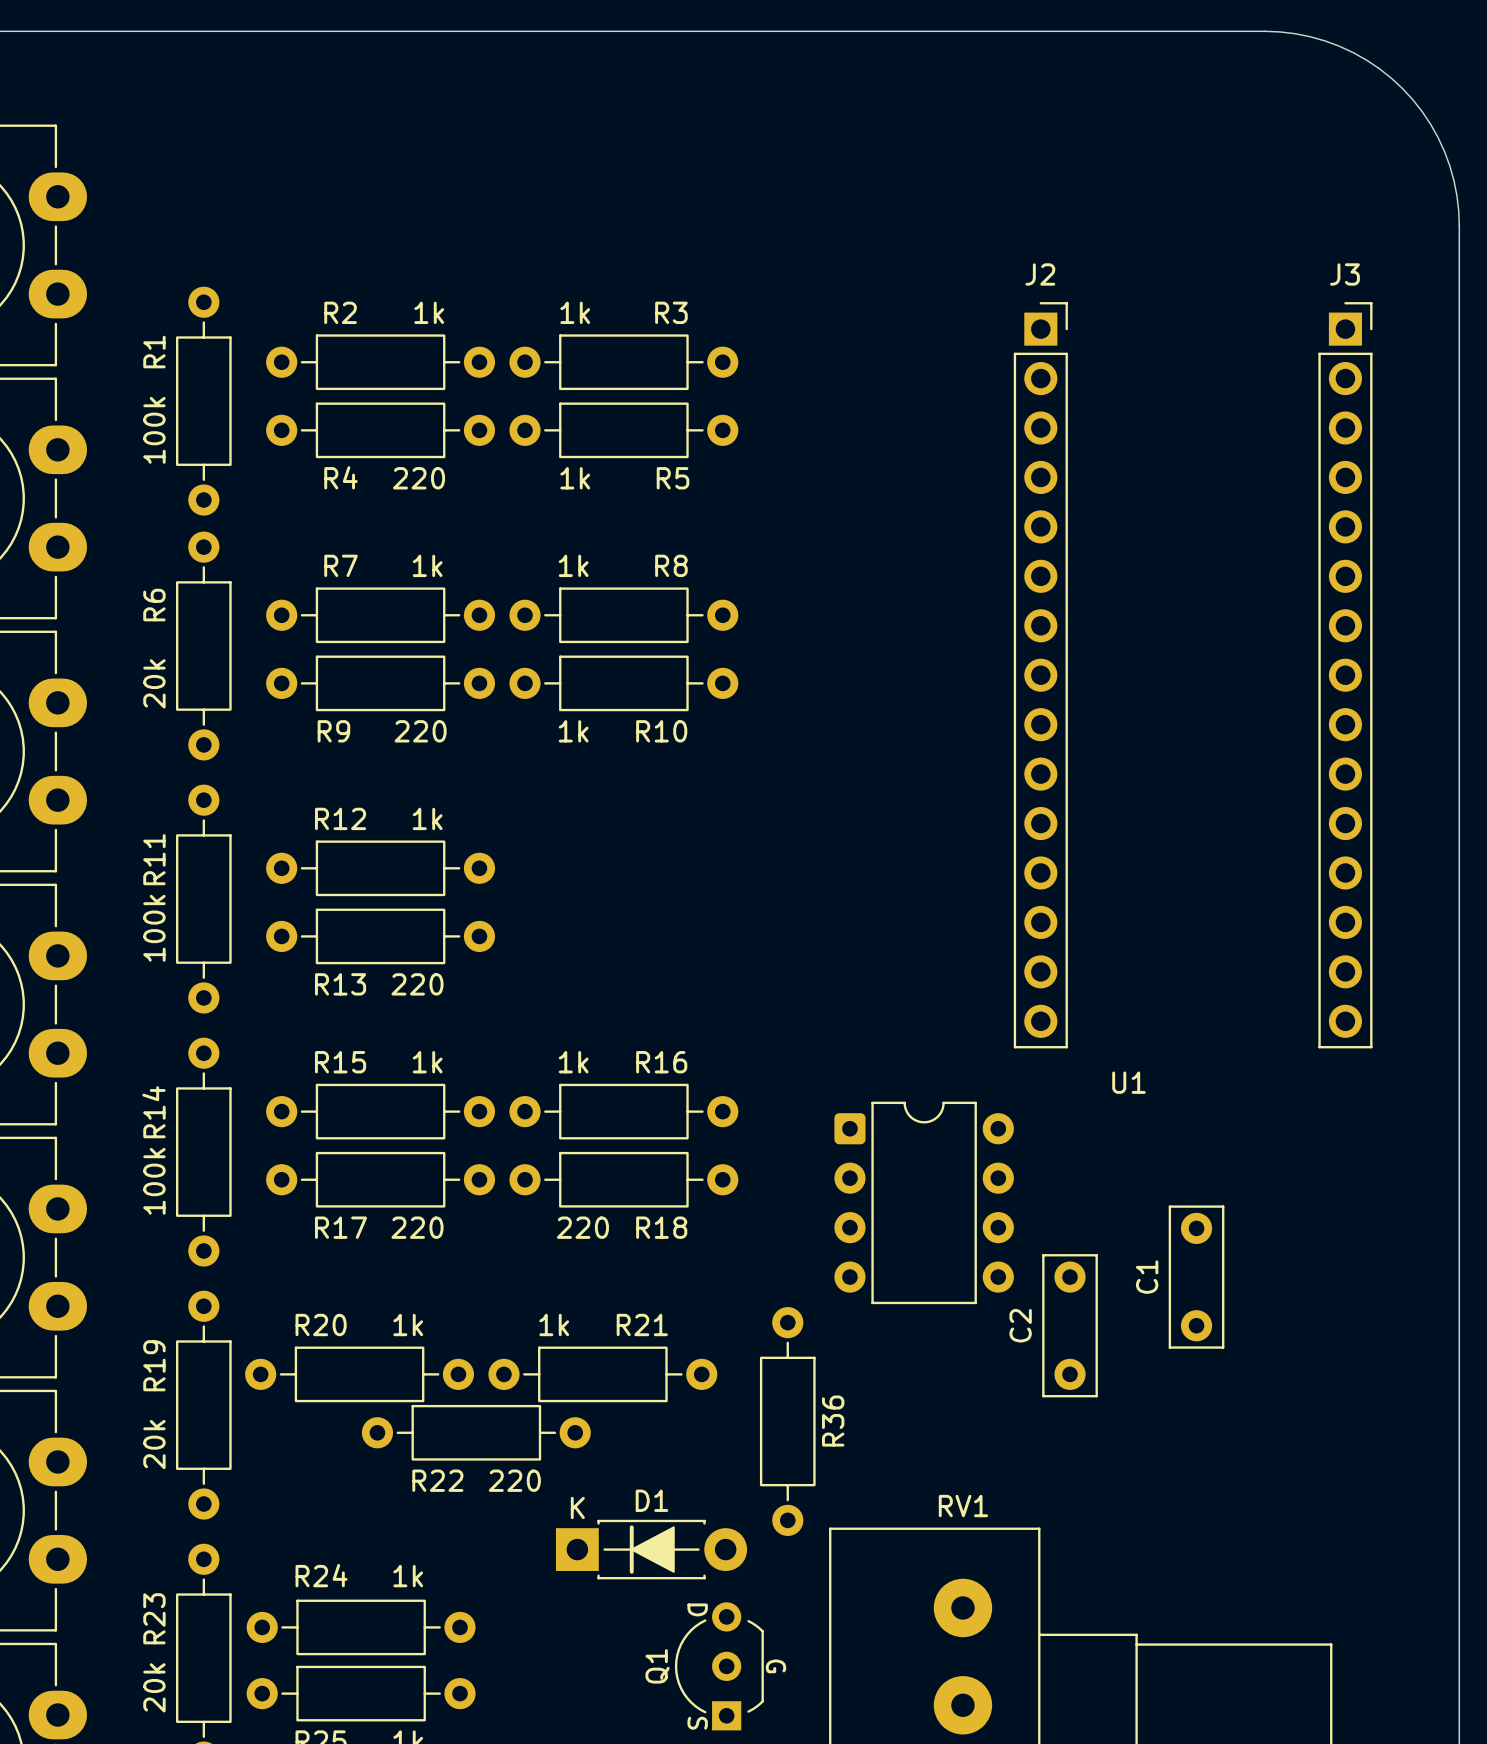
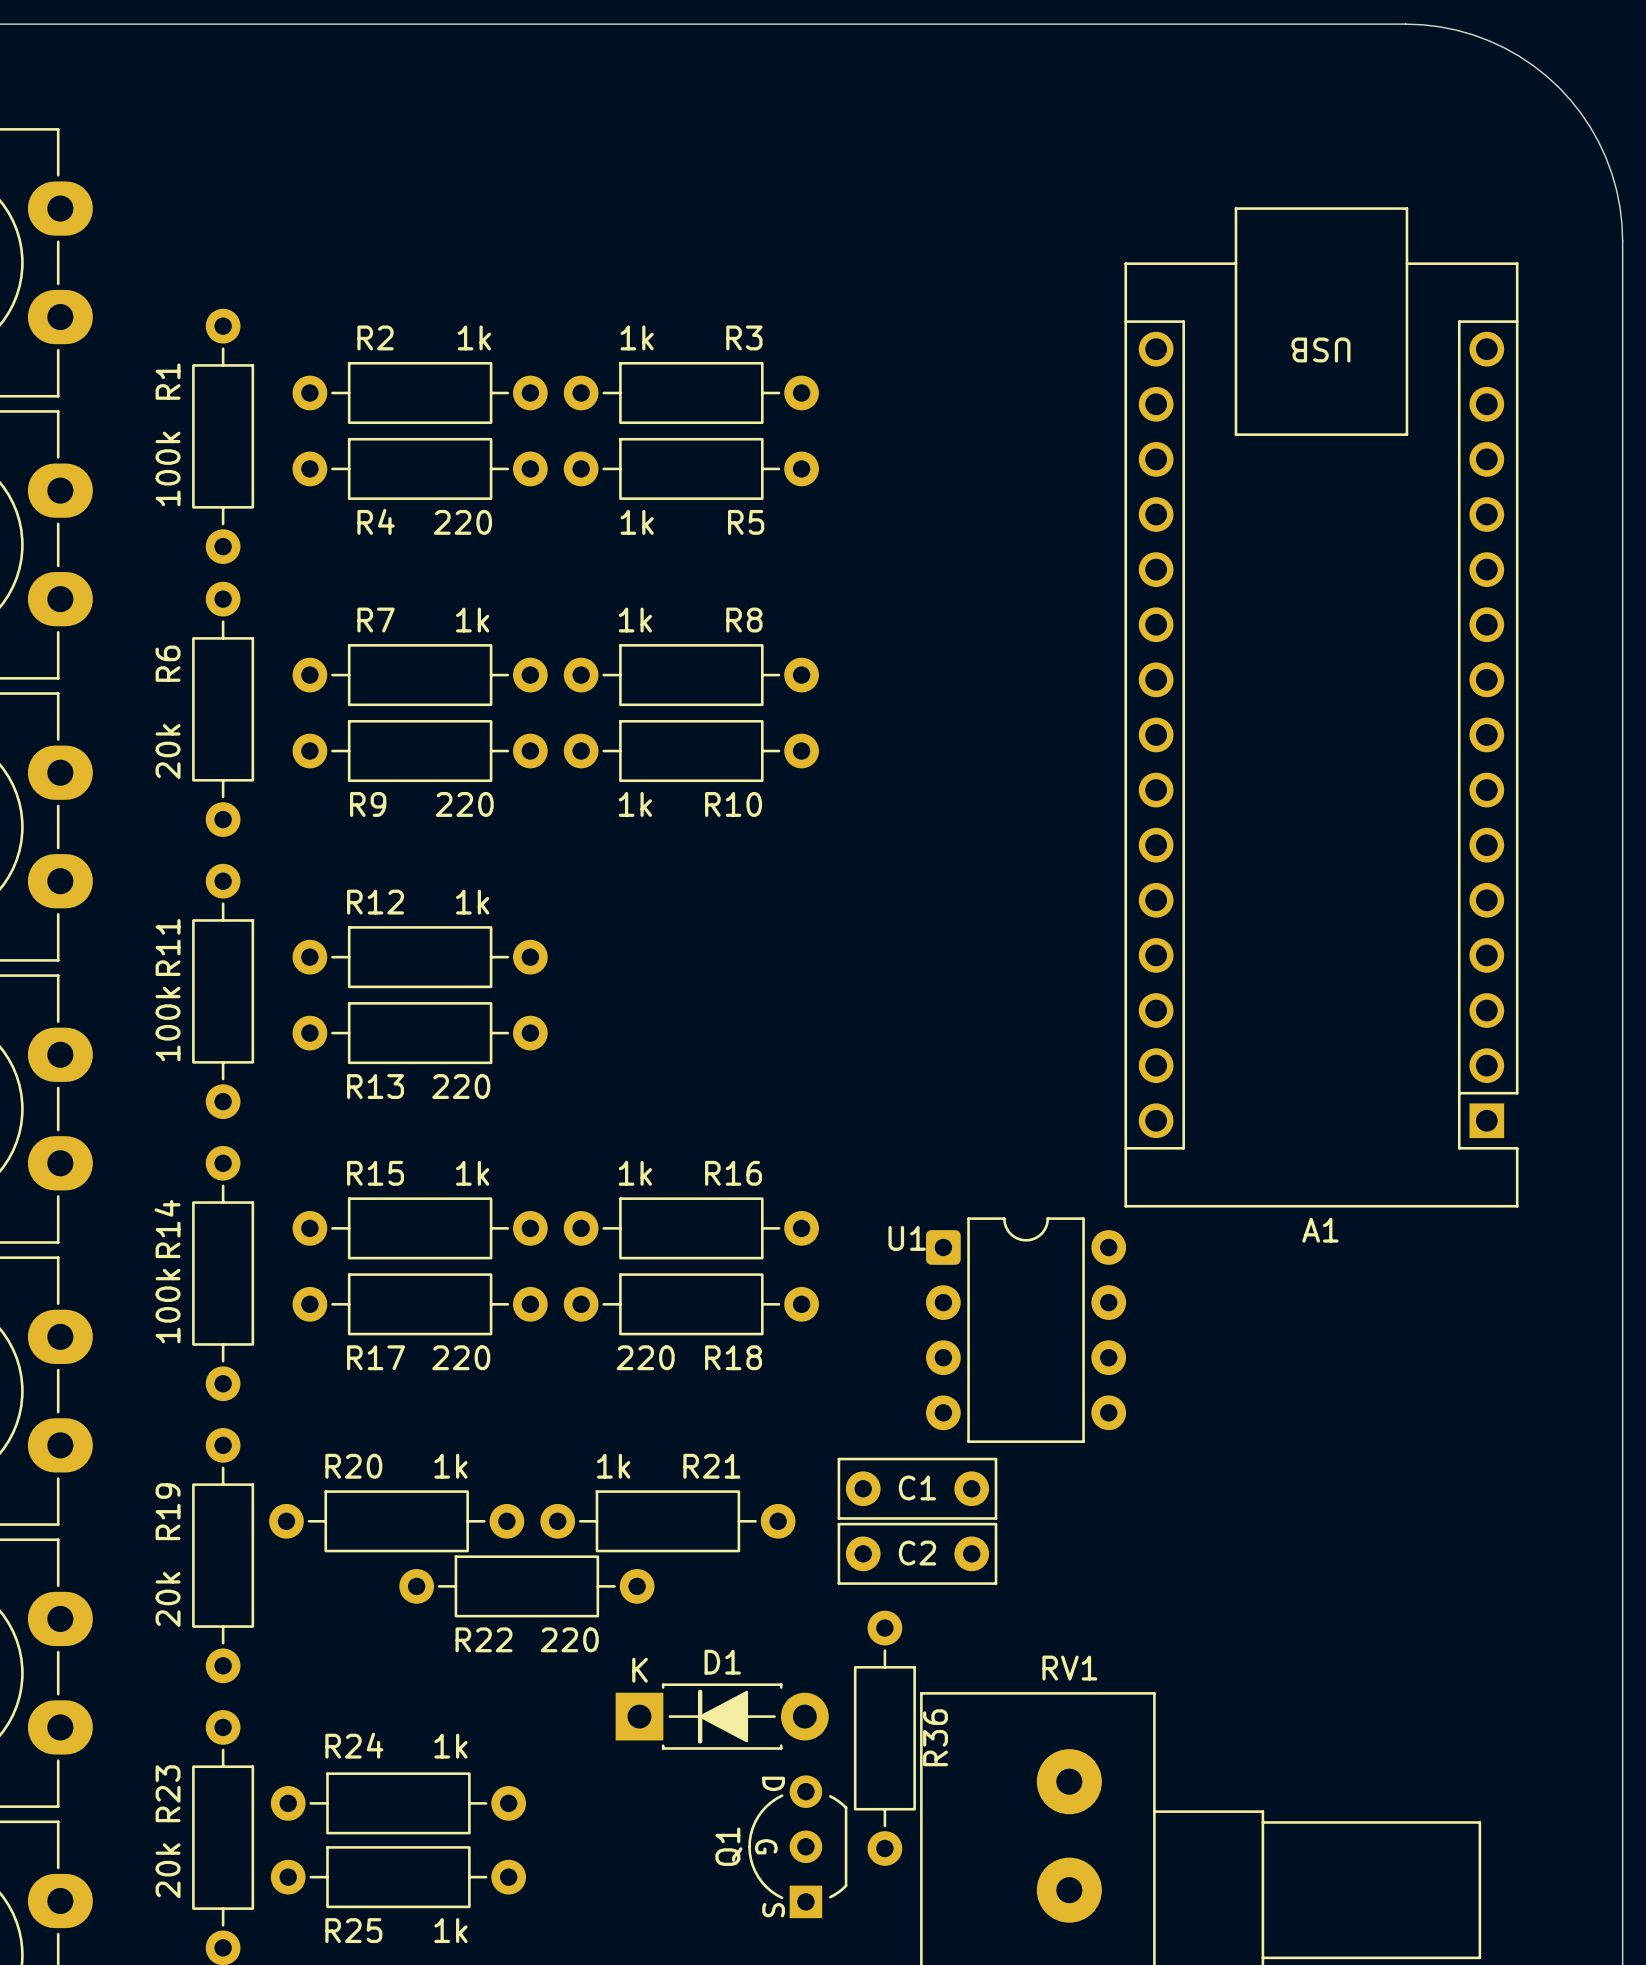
A1: none -> (1321, 707)
J2: (1040, 675) -> none
J3: (1345, 675) -> none
U1 name position: U1 (1128, 1082) -> U1 (907, 1238)
C1 name position: C1 (1147, 1277) -> C1 (917, 1487)
C1 rotation: 0° (1196, 1277) -> 90° clockwise (917, 1488)
C1 position: (1196, 1277) -> (917, 1488)
C2 name position: C2 (1020, 1325) -> C2 (917, 1553)
C2 rotation: 0° (1070, 1325) -> 90° clockwise (917, 1553)
C2 position: (1070, 1325) -> (917, 1553)
R36 position: (787, 1421) -> (884, 1738)
Q1 text position: G (775, 1666) -> G (766, 1846)

